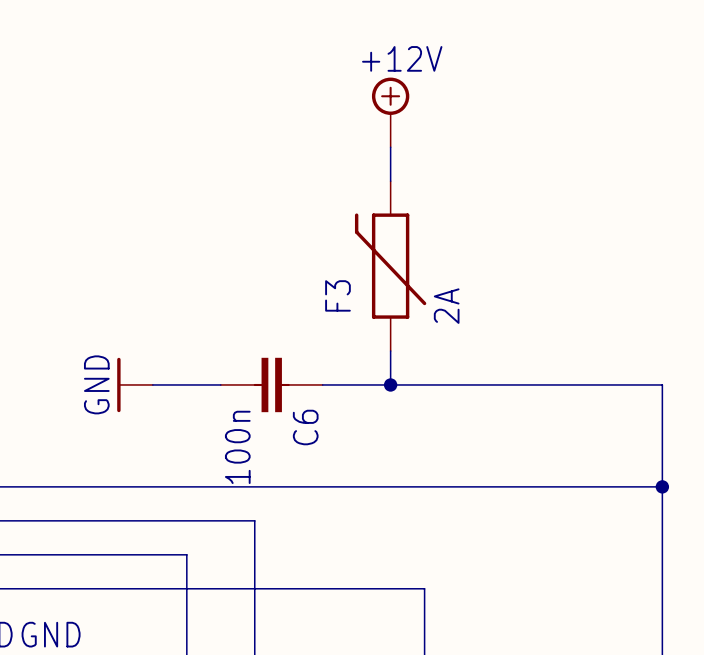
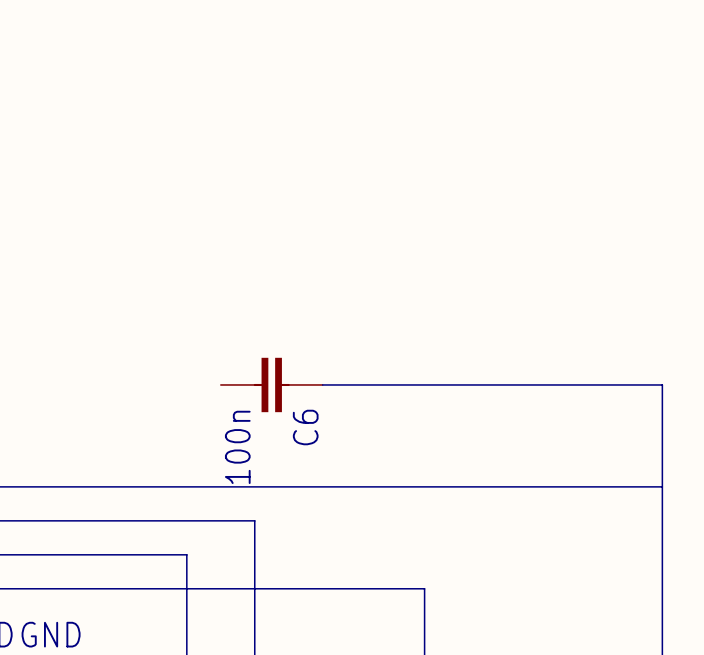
power symbol: +12V (390, 112) -> none
wire: (390, 147) (390, 181) -> none
F3: 2A (390, 266) -> none
wire: (390, 351) (390, 384) -> none
power symbol: GND (135, 384) -> none
wire: (152, 384) (220, 384) -> none
junction: (390, 384) -> none
junction: (662, 486) -> none

